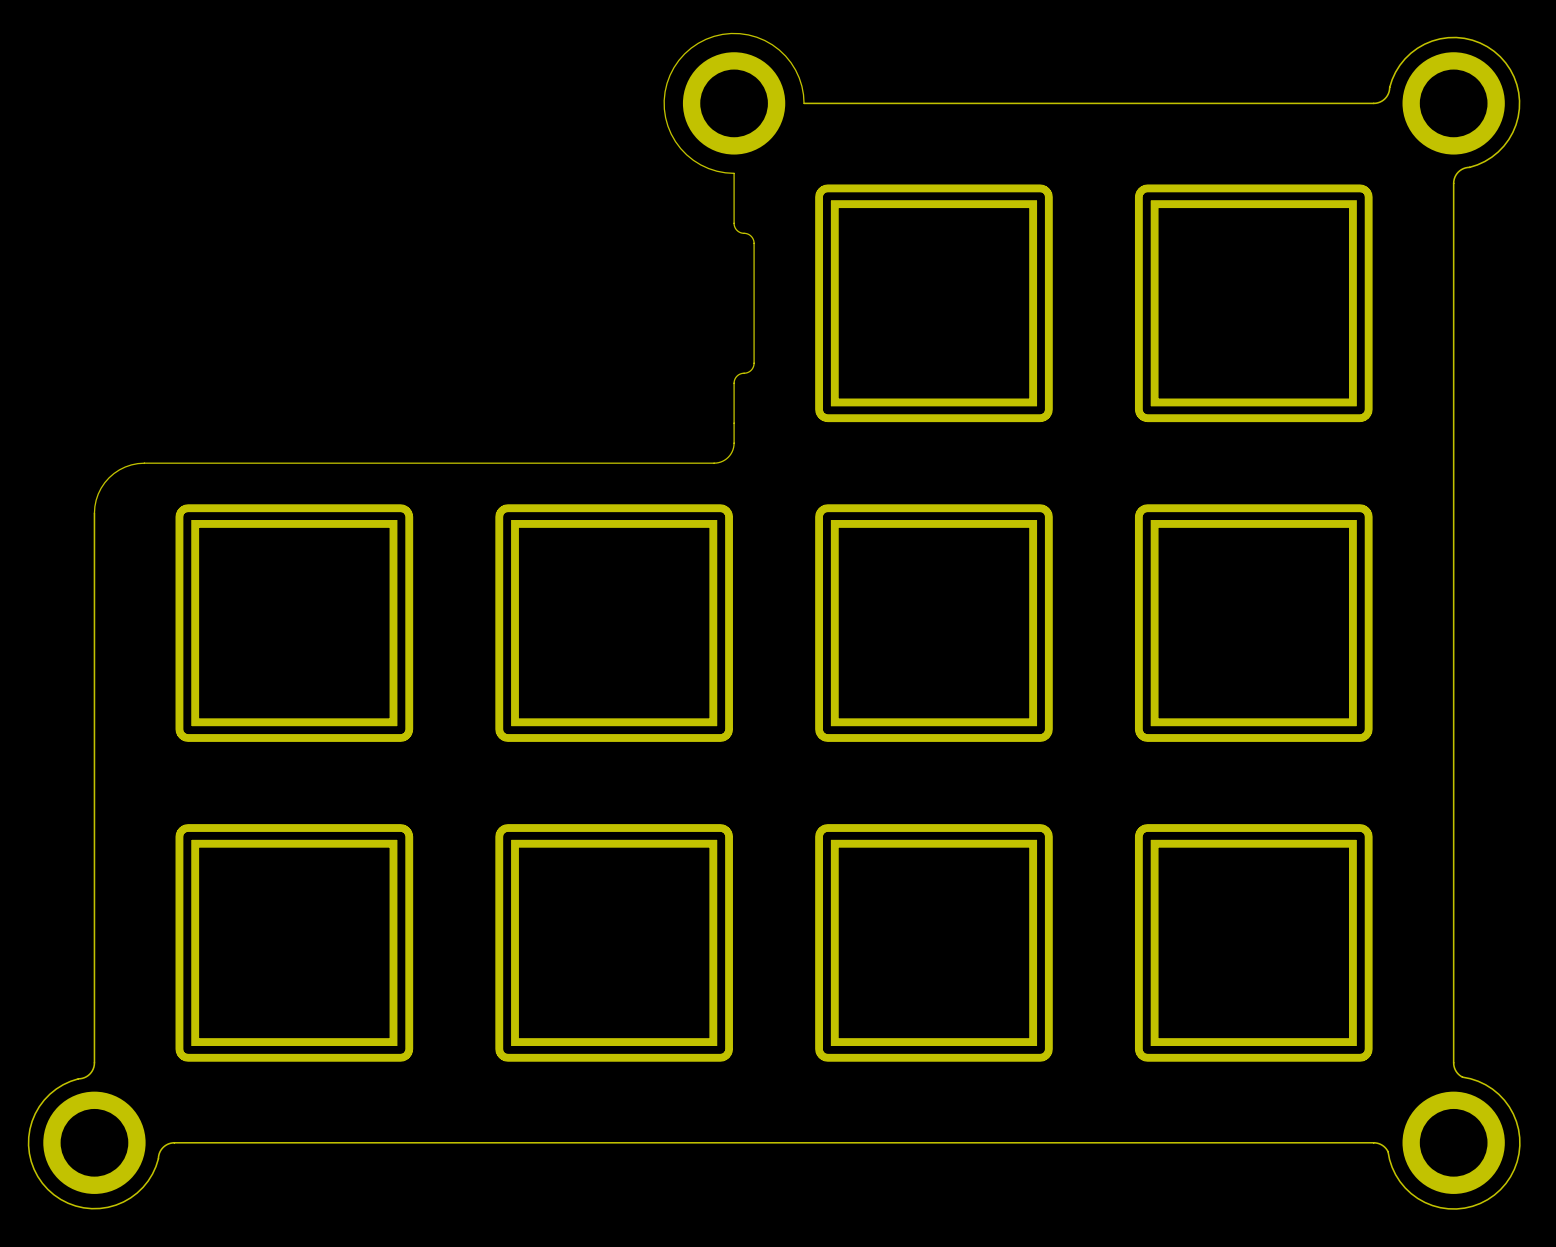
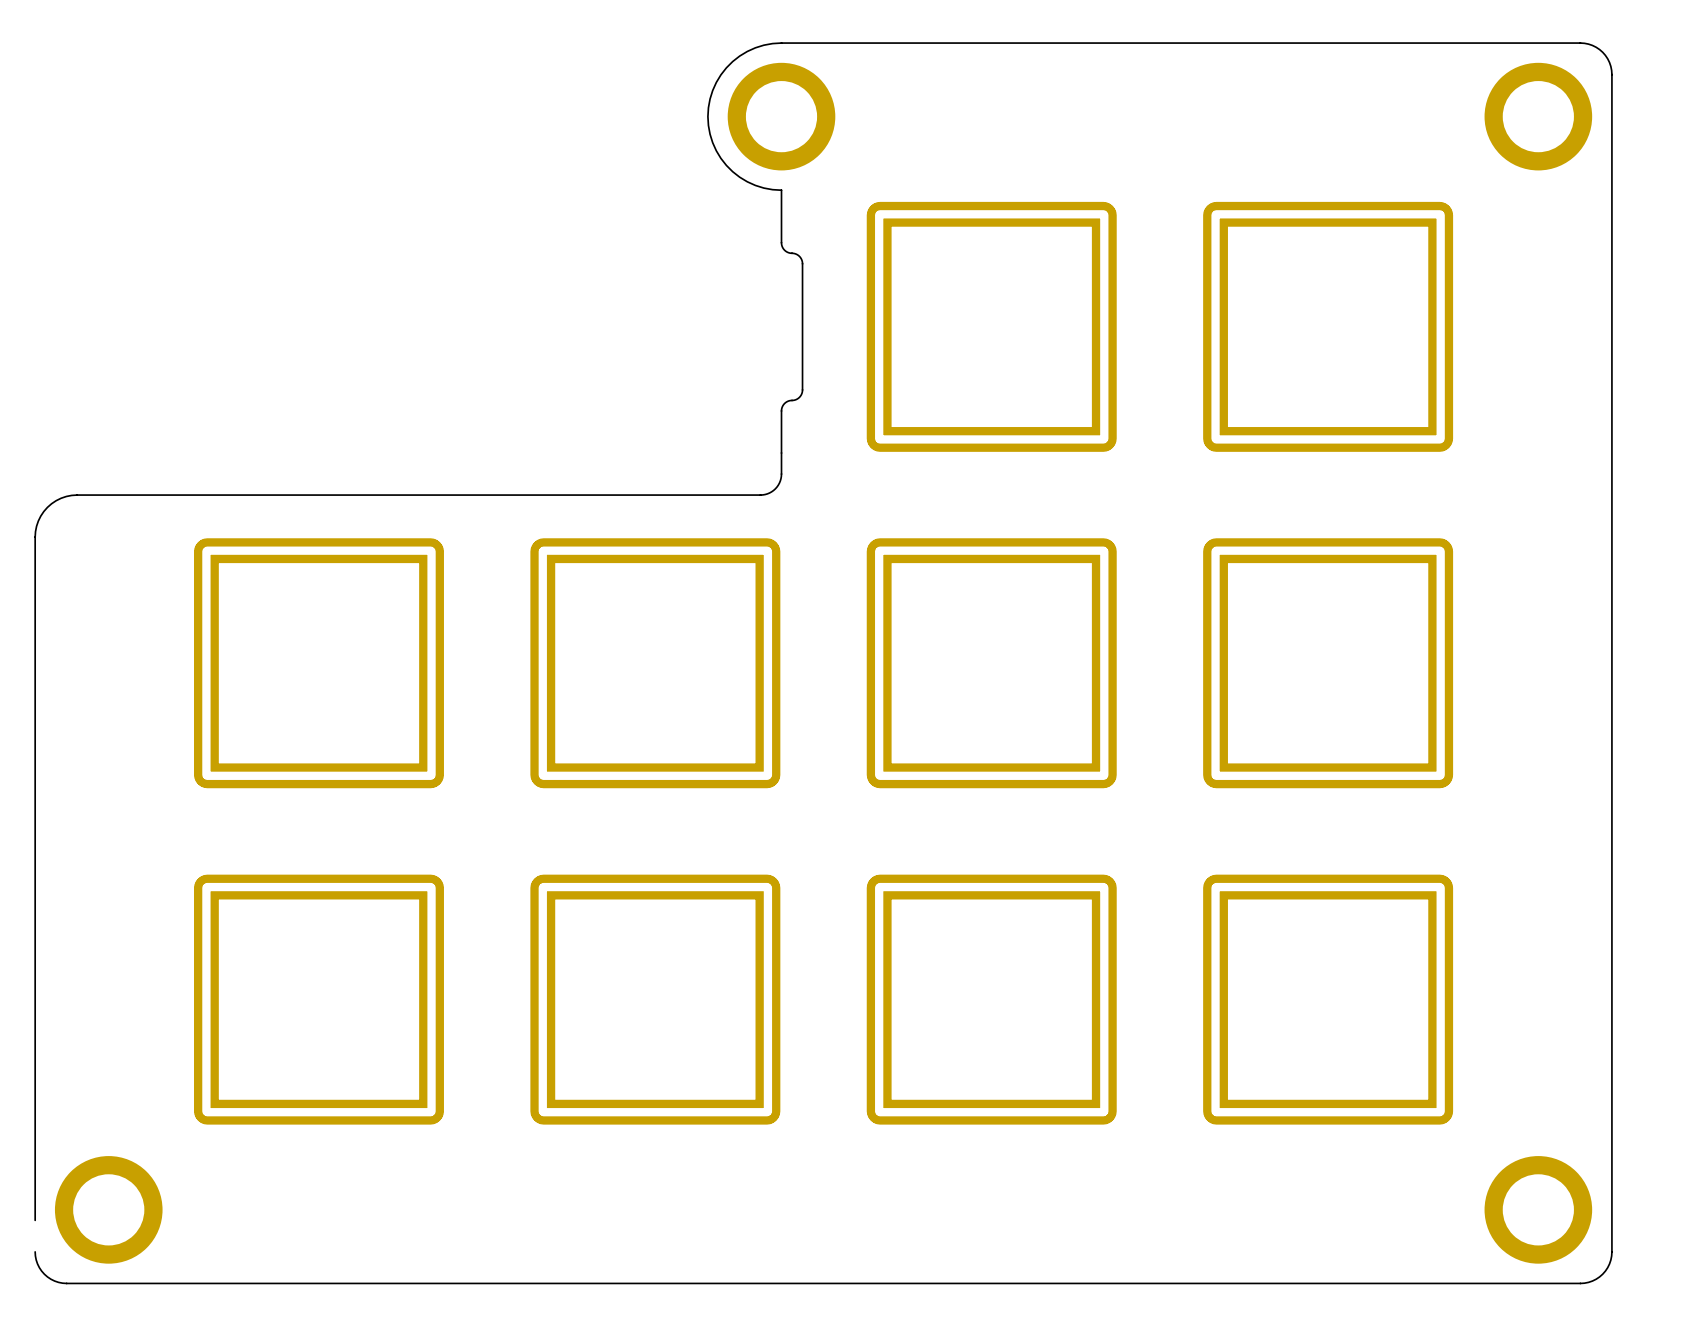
board edge: (734, 173) (708, 168) (686, 154) (671, 134) (664, 109) (667, 83) (678, 60) (698, 43) (722, 34) (739, 33) (756, 37) (779, 50) (795, 70) (801, 86) (804, 103) (1373, 103) (1379, 102) (1386, 97) (1395, 72) (1405, 58) (1417, 48) (1432, 41) (1456, 37) (1472, 40) (1487, 46) (1505, 62) (1514, 76) (1518, 92) (1519, 108) (1512, 132) (1503, 146) (1491, 157) (1477, 164) (1459, 170) (1455, 175) (1453, 183) (1453, 1062) (1455, 1069) (1460, 1076) (1485, 1084) (1498, 1094) (1509, 1106) (1516, 1121) (1519, 1137) (1517, 1161) (1505, 1183) (1494, 1195) (1480, 1203) (1456, 1208) (1440, 1207) (1424, 1202) (1411, 1193) (1400, 1181) (1392, 1167) (1386, 1148) (1380, 1144) (1373, 1142) (174, 1142) (167, 1144) (161, 1148) (148, 1180) (137, 1193) (123, 1201) (108, 1207) (91, 1208) (75, 1206) (60, 1199) (42, 1183) (34, 1169) (29, 1153) (28, 1137) (32, 1121) (44, 1100) (63, 1084) (88, 1075) (94, 1064) (94, 506) (101, 488) (114, 473) (131, 464) (144, 463) -> (781, 190) (755, 185) (732, 171) (716, 150) (708, 125) (710, 99) (716, 82) (726, 67) (747, 51) (772, 43) (1580, 43) (1592, 45) (1605, 55) (1609, 62) (1611, 74) (1611, 1251) (1610, 1260) (1605, 1271) (1596, 1279) (1580, 1283) (66, 1283) (54, 1281) (44, 1274) (37, 1263) (35, 1251)
board edge: none -> (161, 495) (66, 496) (56, 500) (43, 511) (35, 531) (35, 1220)

